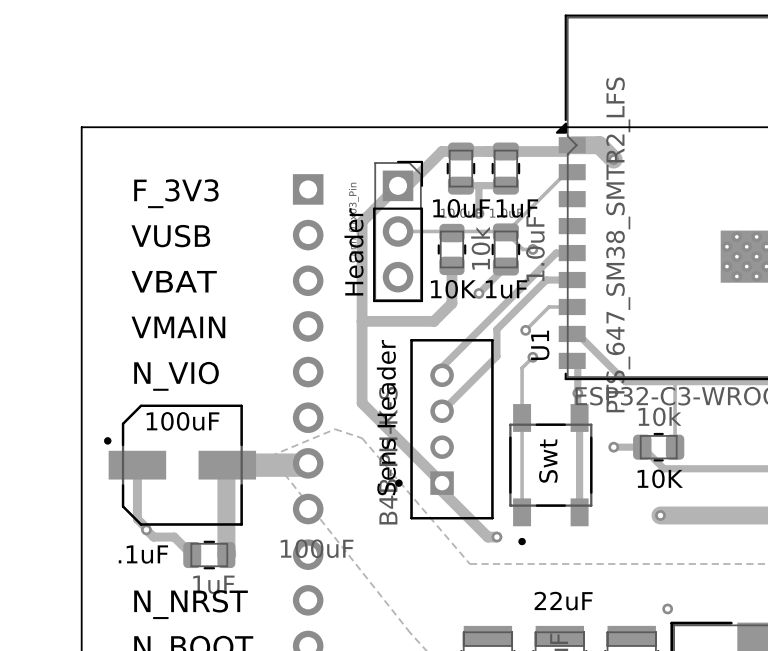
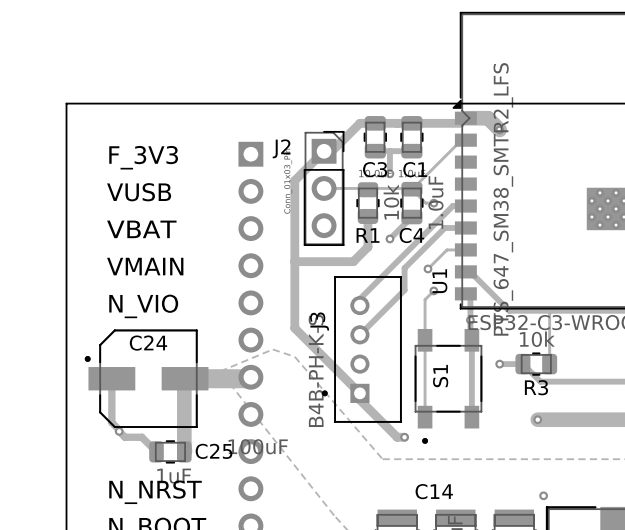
10uF name: 10uF (461, 208) -> C3 (375, 169)
1uF name: 1uF (517, 208) -> C1 (415, 169)
Header name: Header (354, 251) -> J2 (281, 148)
10K name: 10K (453, 289) -> R1 (368, 235)
1uF name: 1uF (506, 289) -> C4 (411, 235)
Sens Header name: Sens Header (386, 417) -> J3 (319, 321)
100uF name: 100uF (182, 421) -> C24 (148, 343)
Swt name: Swt (548, 461) -> S1 (440, 376)
10K name: 10K (660, 478) -> R3 (536, 387)
.1uF name: .1uF (143, 554) -> C25 (214, 451)
22uF name: 22uF (563, 601) -> C14 (434, 491)

